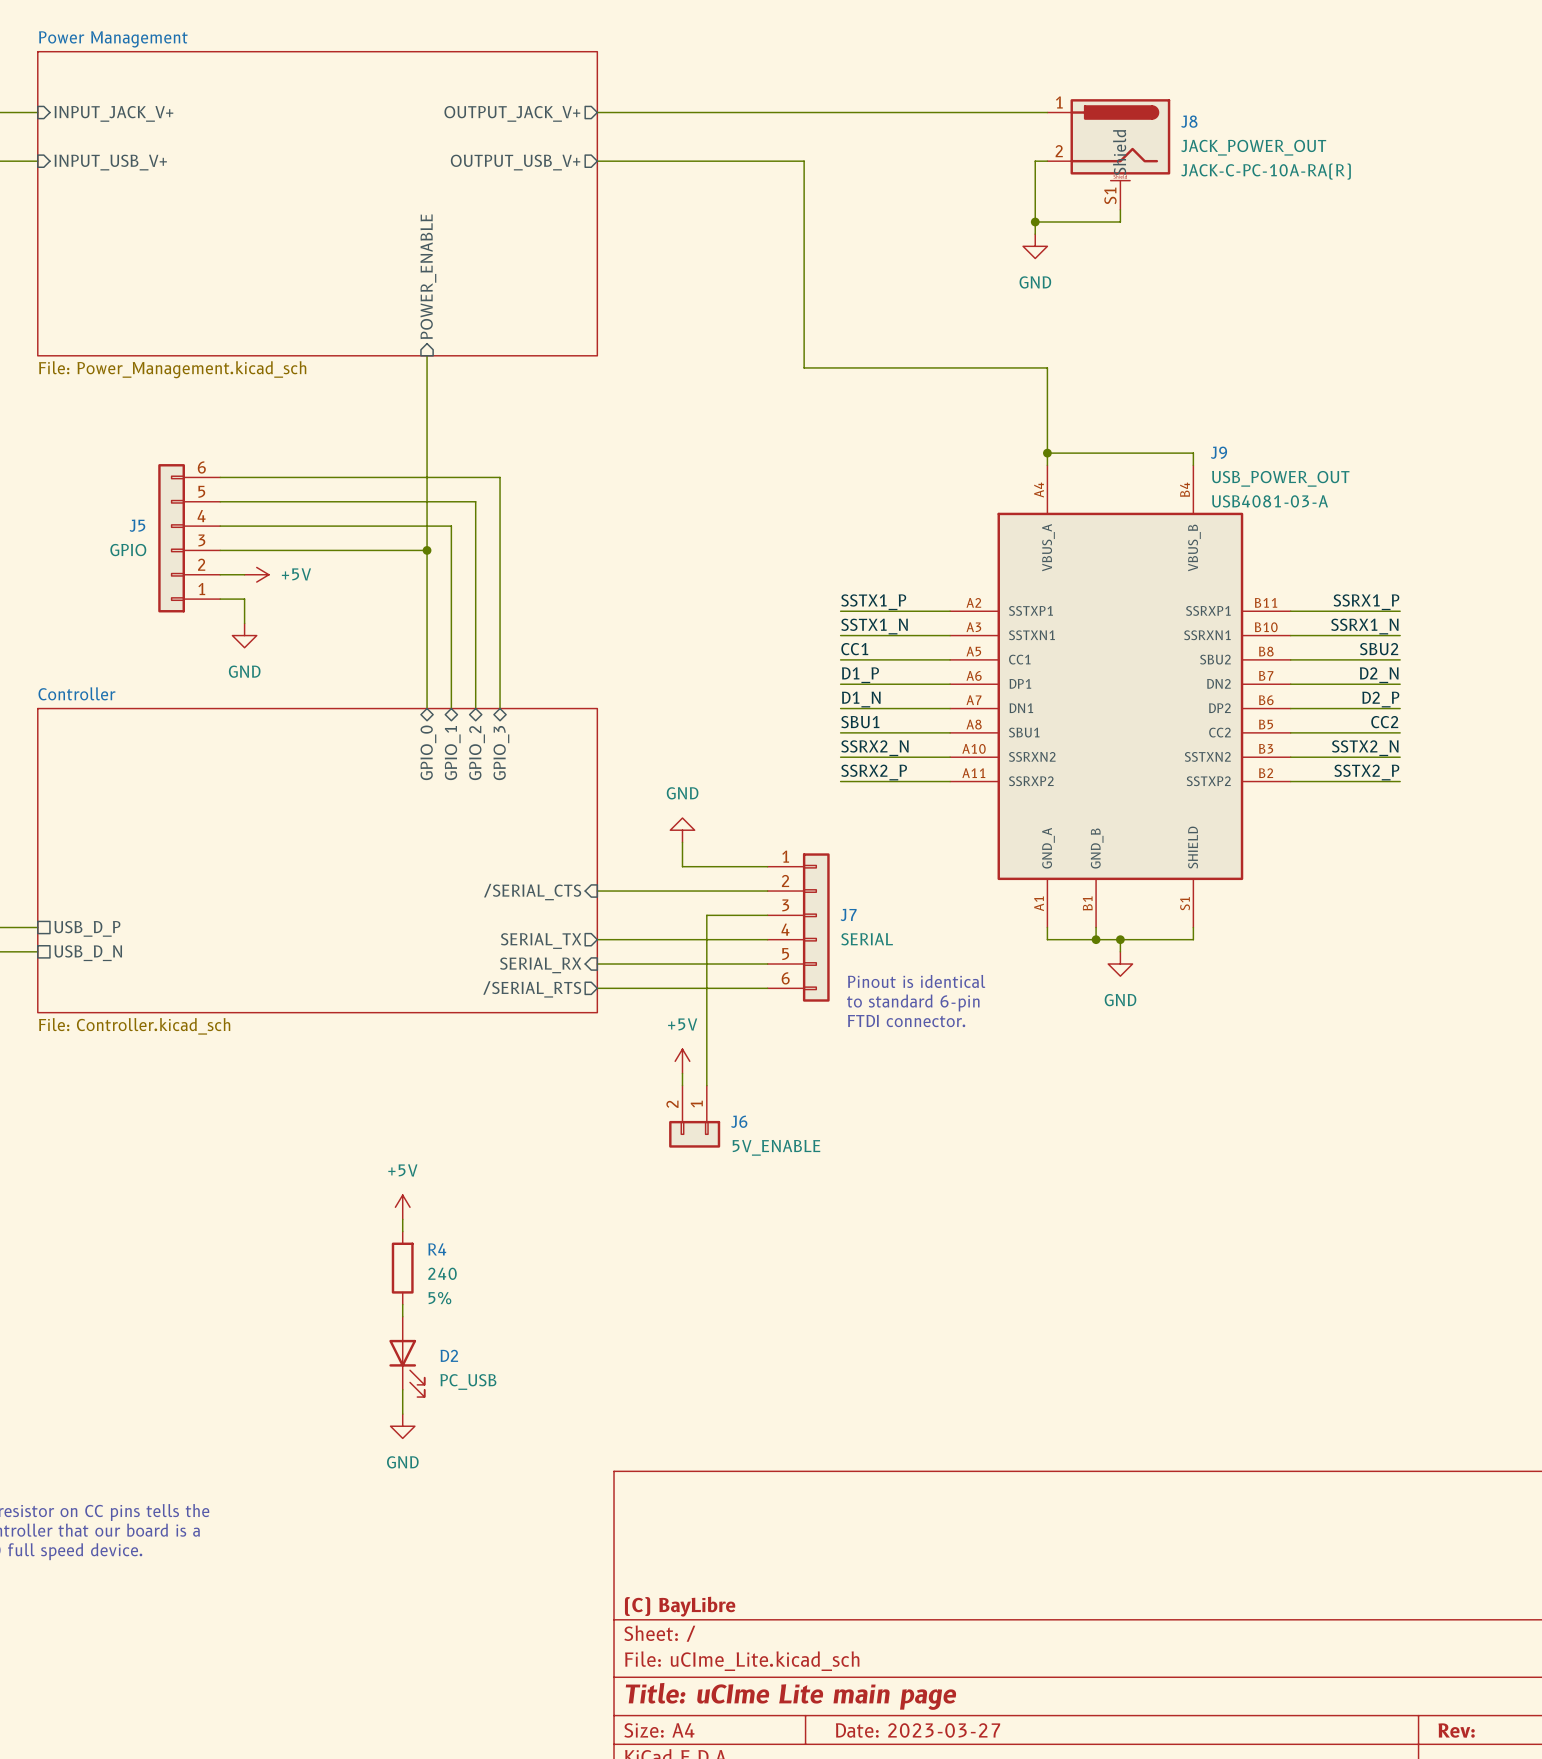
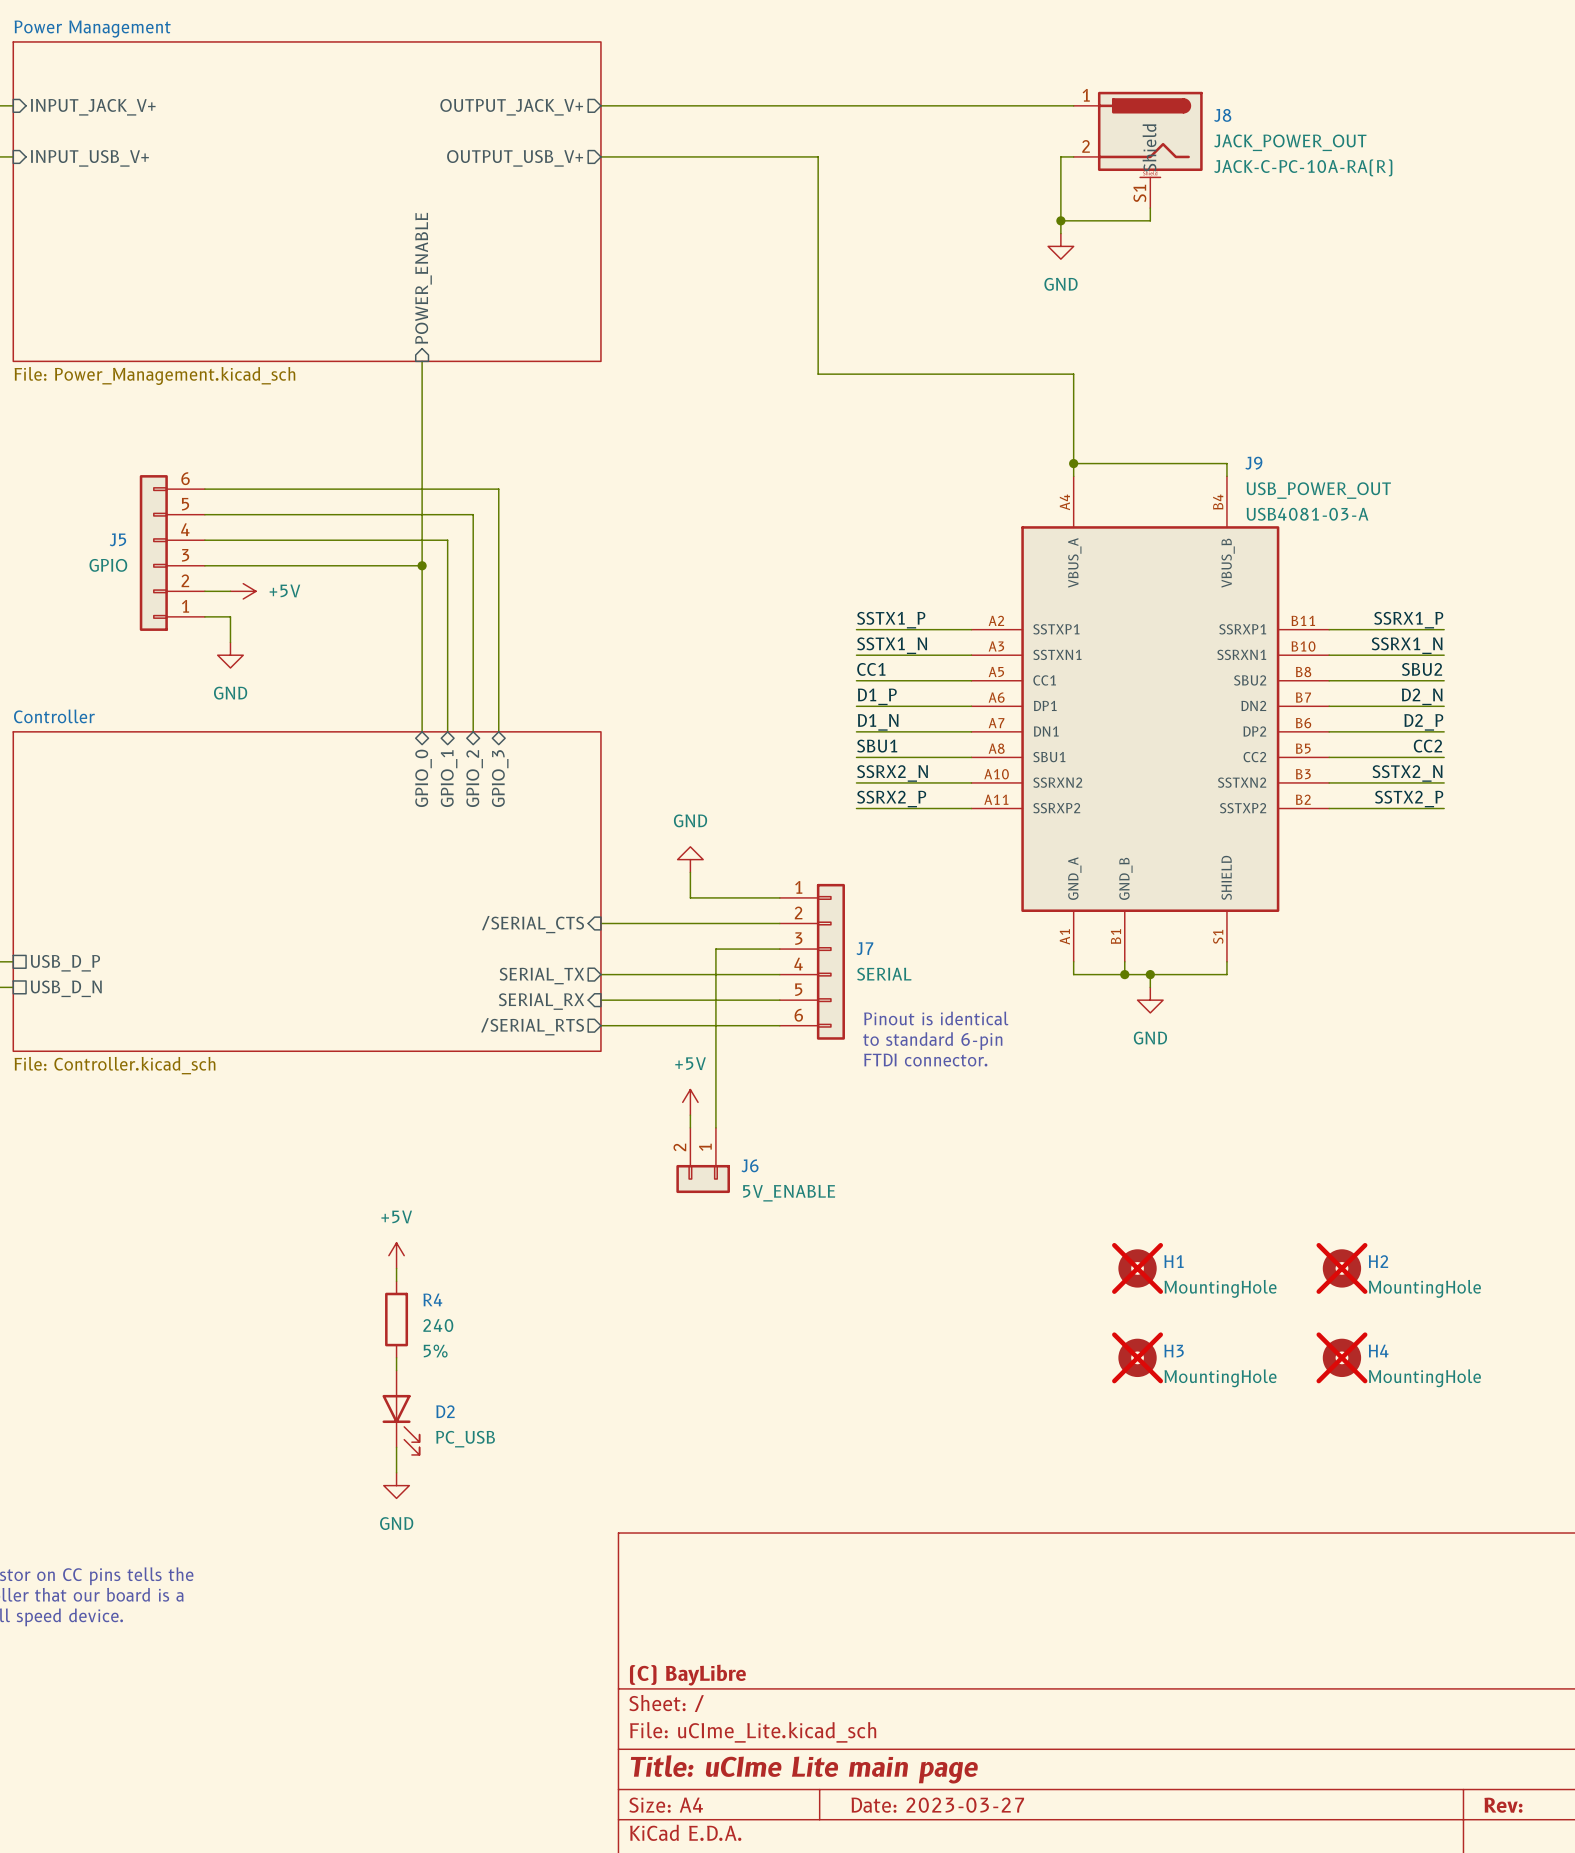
H1: none -> MountingHole (1137, 1268)
H2: none -> MountingHole (1341, 1268)
H3: none -> MountingHole (1137, 1357)
H4: none -> MountingHole (1341, 1357)

